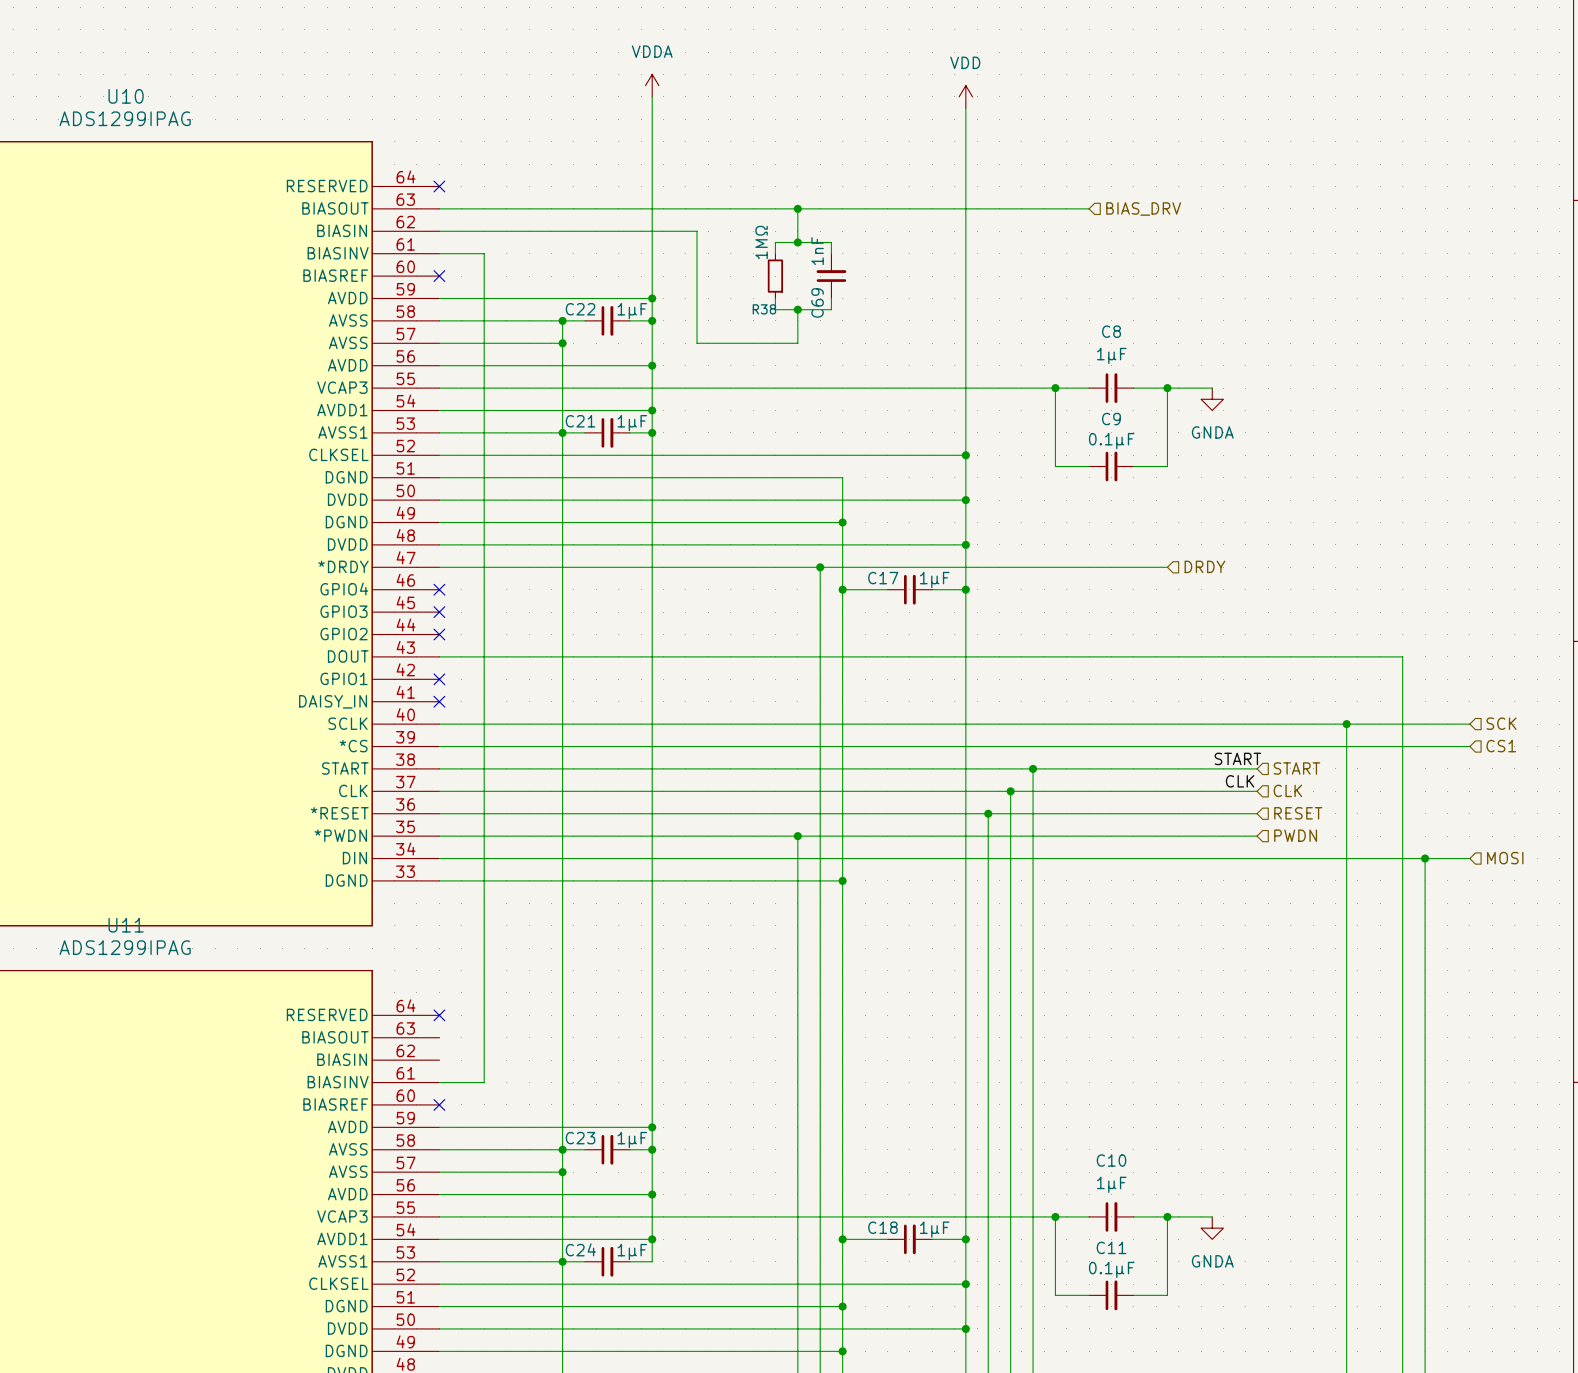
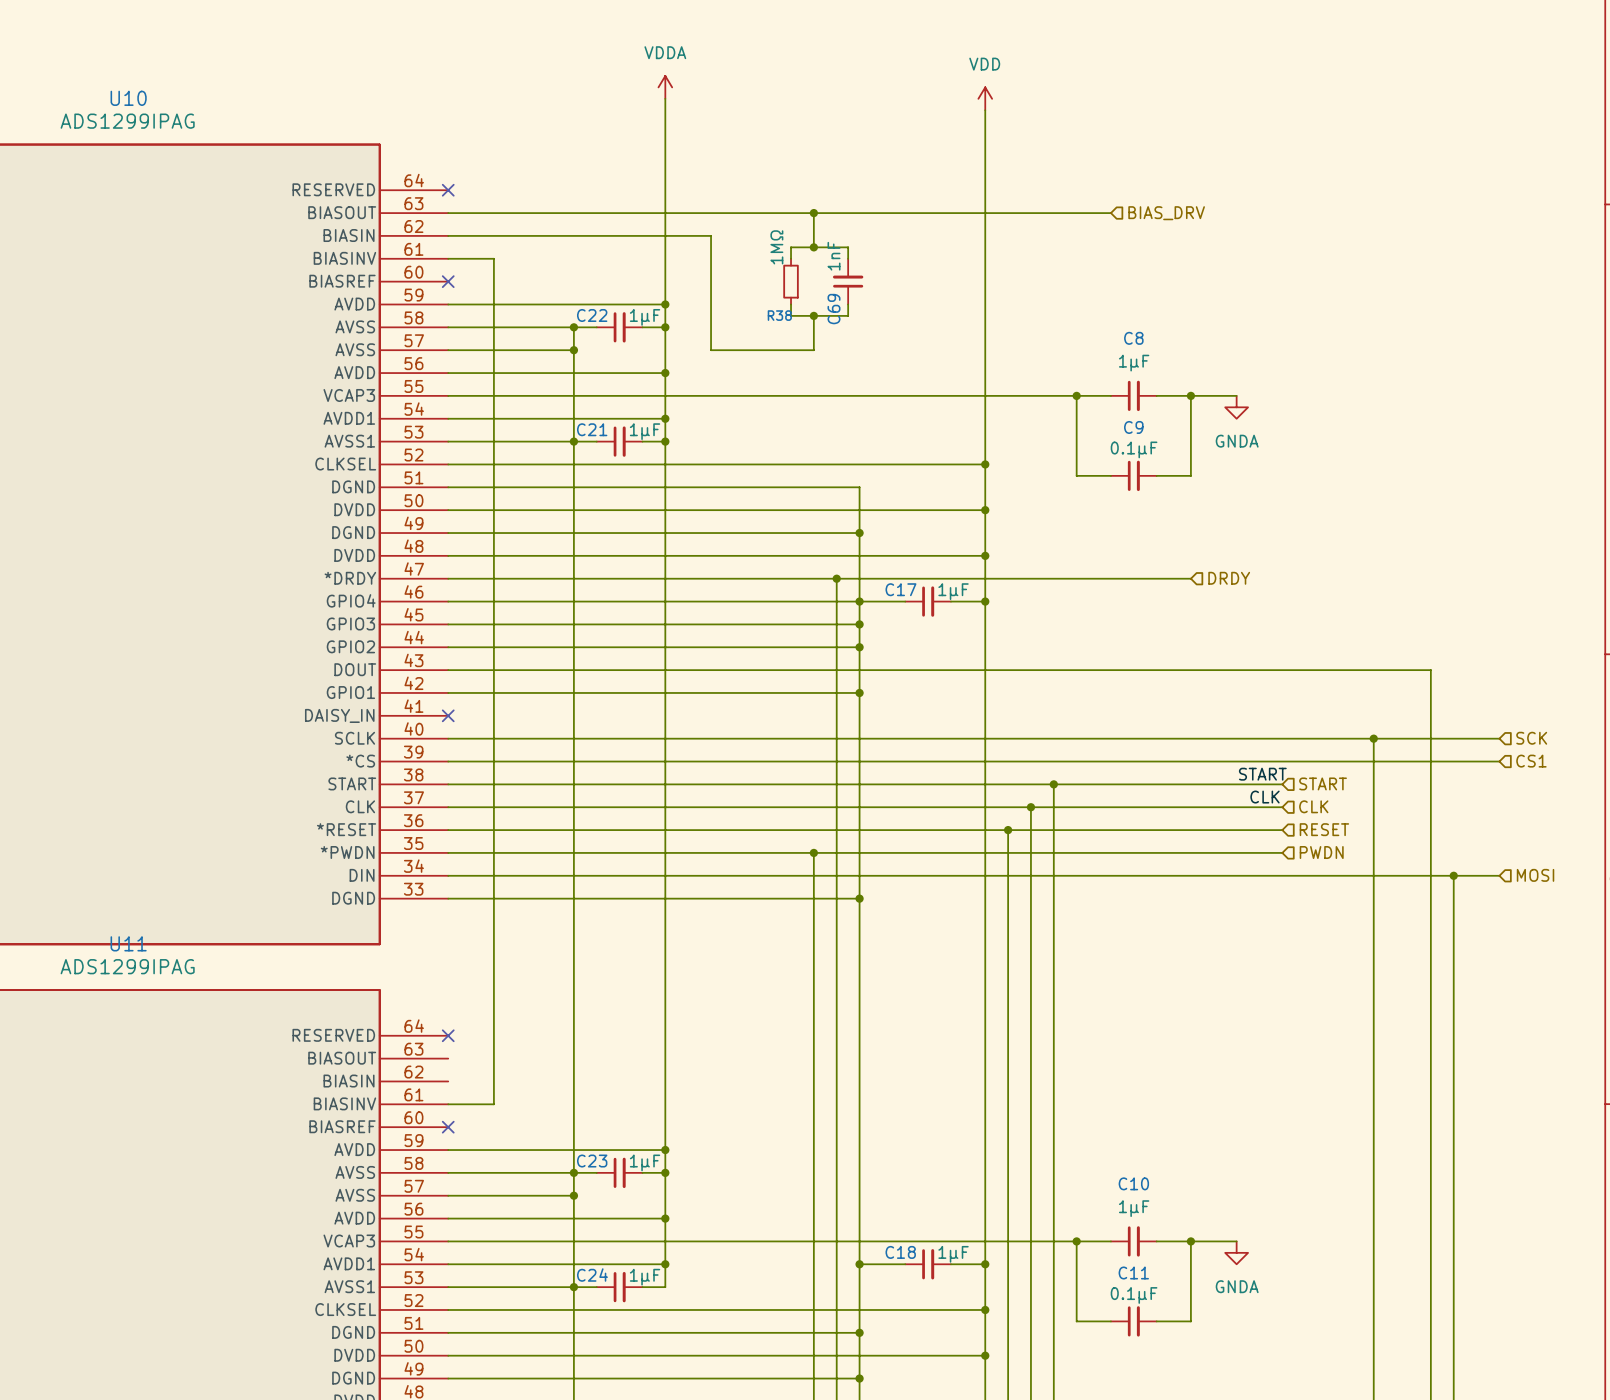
wire: none -> (448, 601) (859, 601)
no-connect mark: (439, 589) -> none
wire: none -> (448, 624) (859, 624)
no-connect mark: (439, 612) -> none
junction: none -> (859, 624)
wire: none -> (448, 647) (859, 647)
no-connect mark: (439, 634) -> none
junction: none -> (859, 647)
wire: none -> (448, 692) (859, 692)
no-connect mark: (439, 679) -> none
junction: none -> (859, 692)

